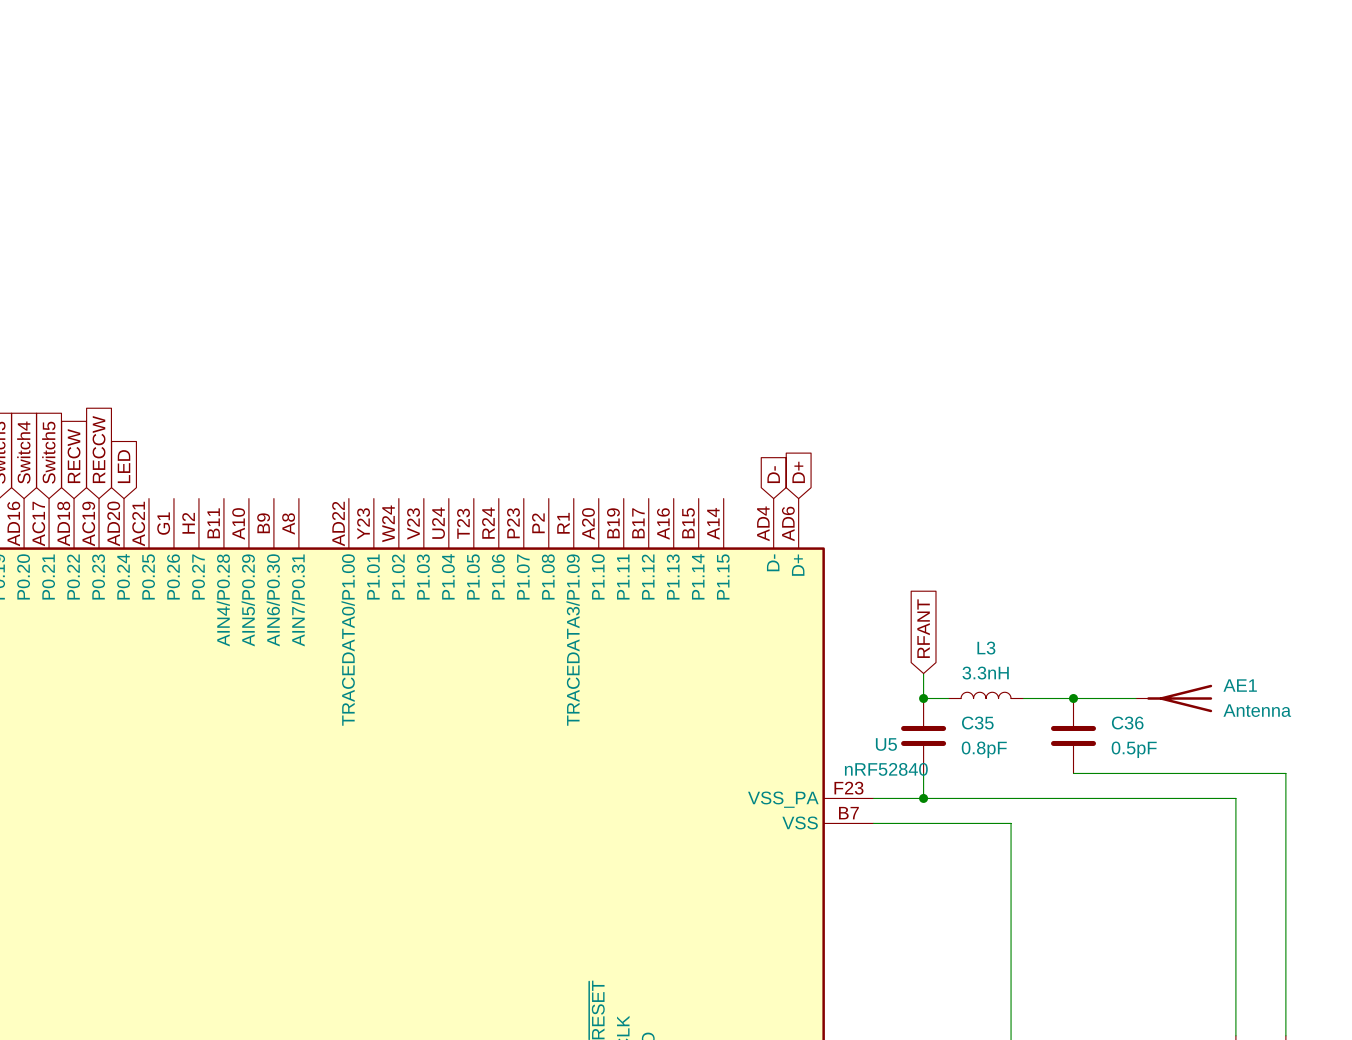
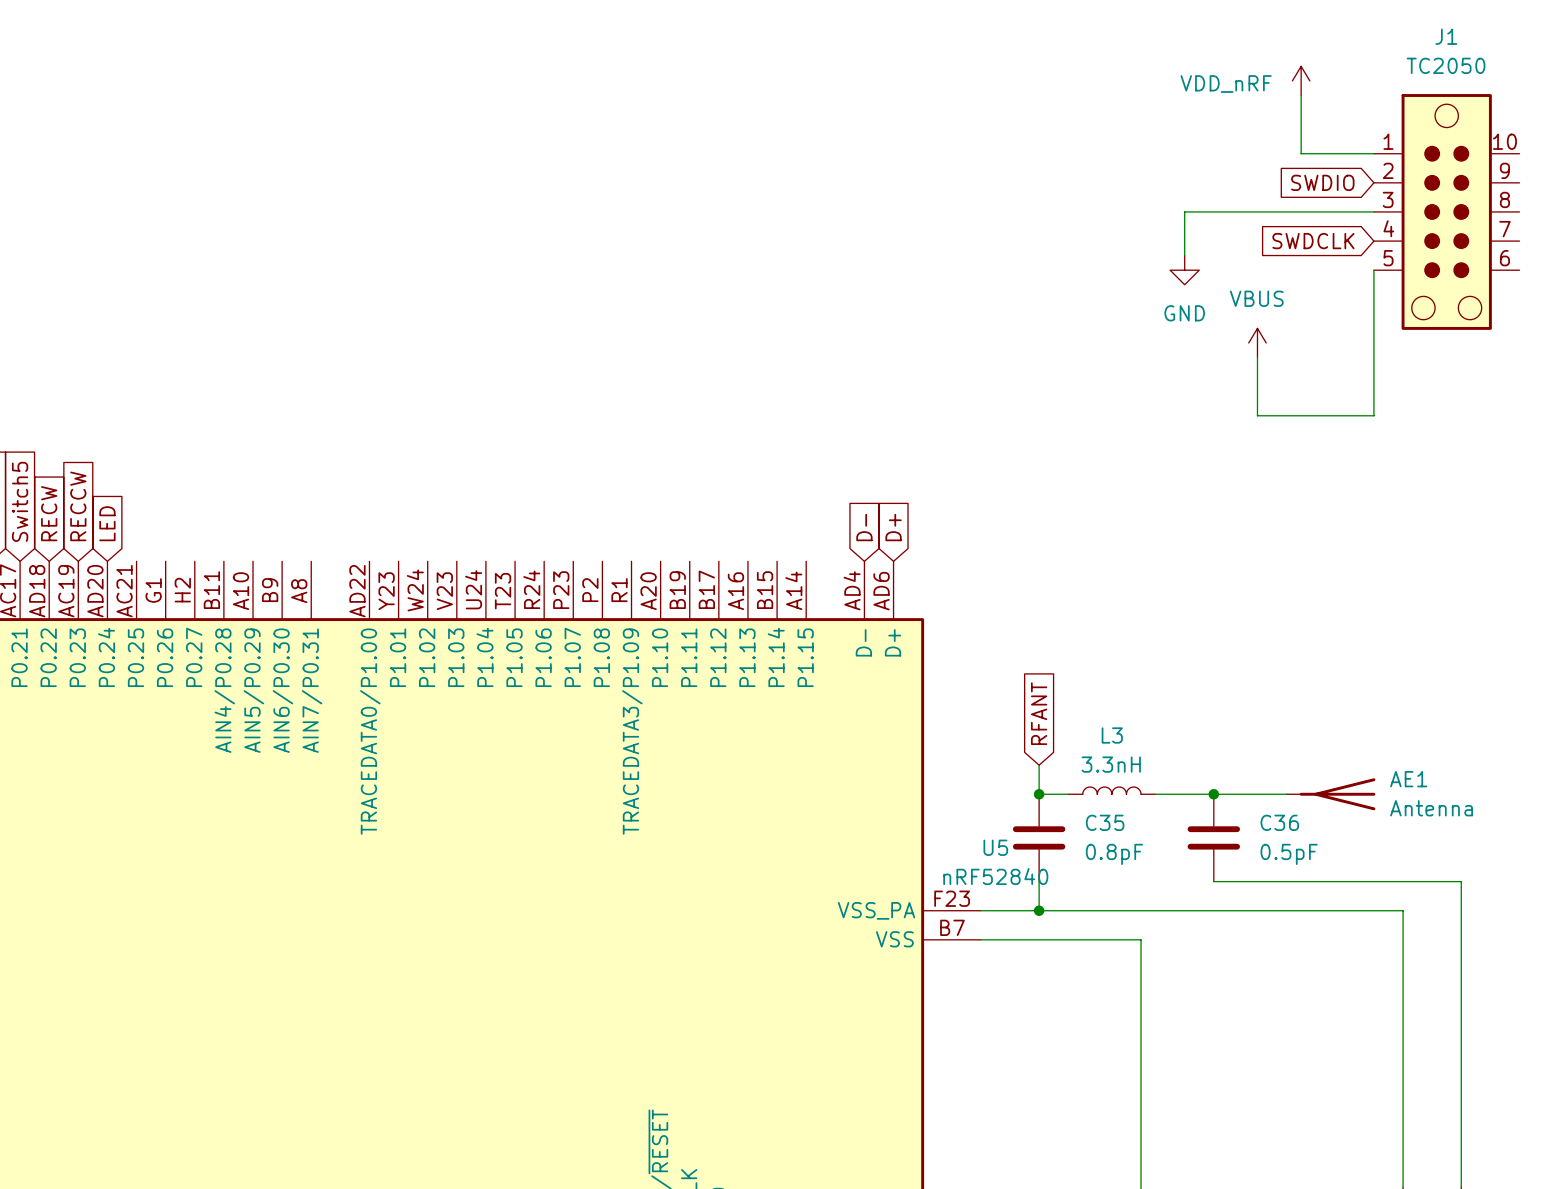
power symbol: none -> VDD_nRF (1301, 80)
wire: none -> (1301, 95) (1301, 153) (1373, 153)
global label: none -> SWDIO (1322, 182)
wire: none -> (1373, 211) (1184, 211) (1184, 255)
J1: none -> TC2050 (1446, 211)
global label: none -> SWDCLK (1313, 241)
power symbol: none -> GND (1184, 270)
wire: none -> (1373, 270) (1373, 415) (1257, 415) (1257, 357)
power symbol: none -> VBUS (1257, 342)

